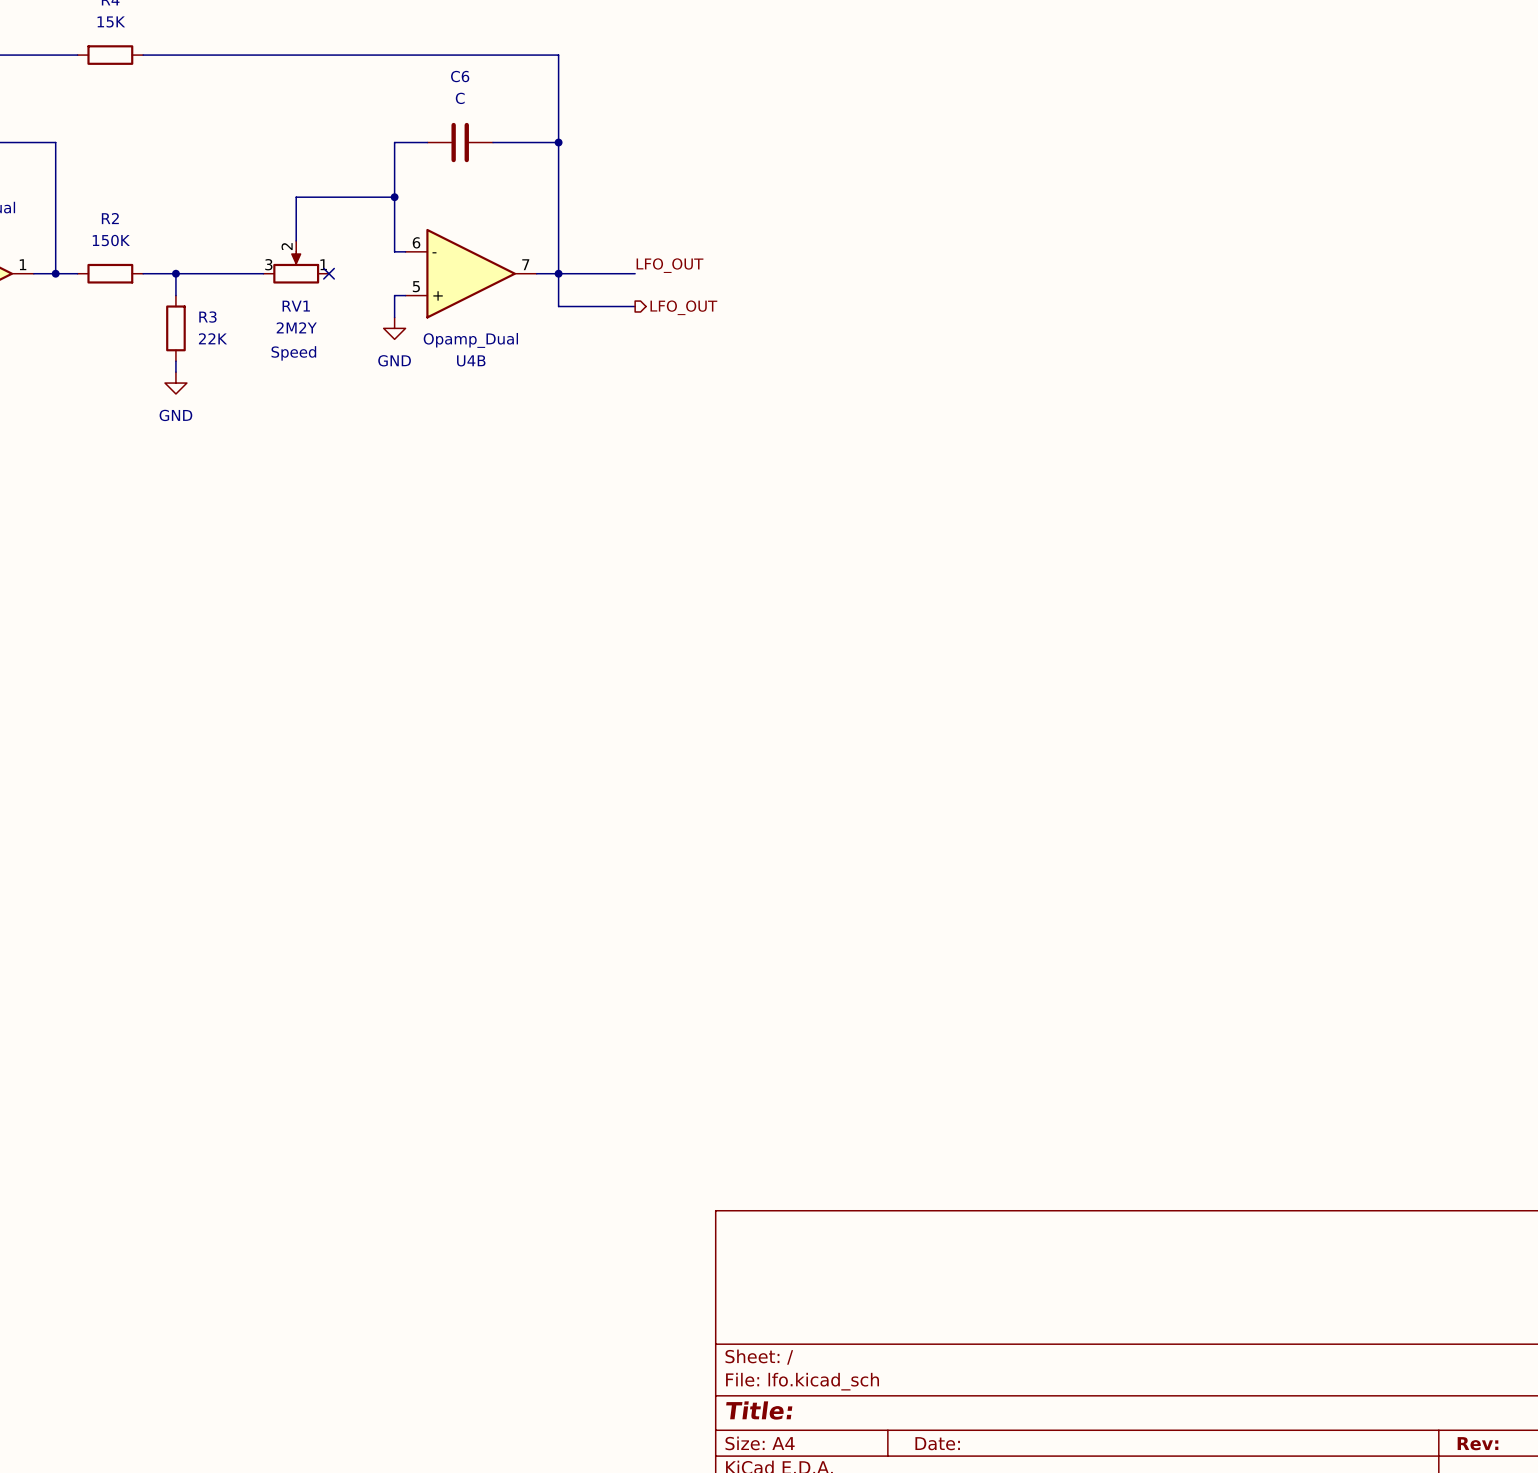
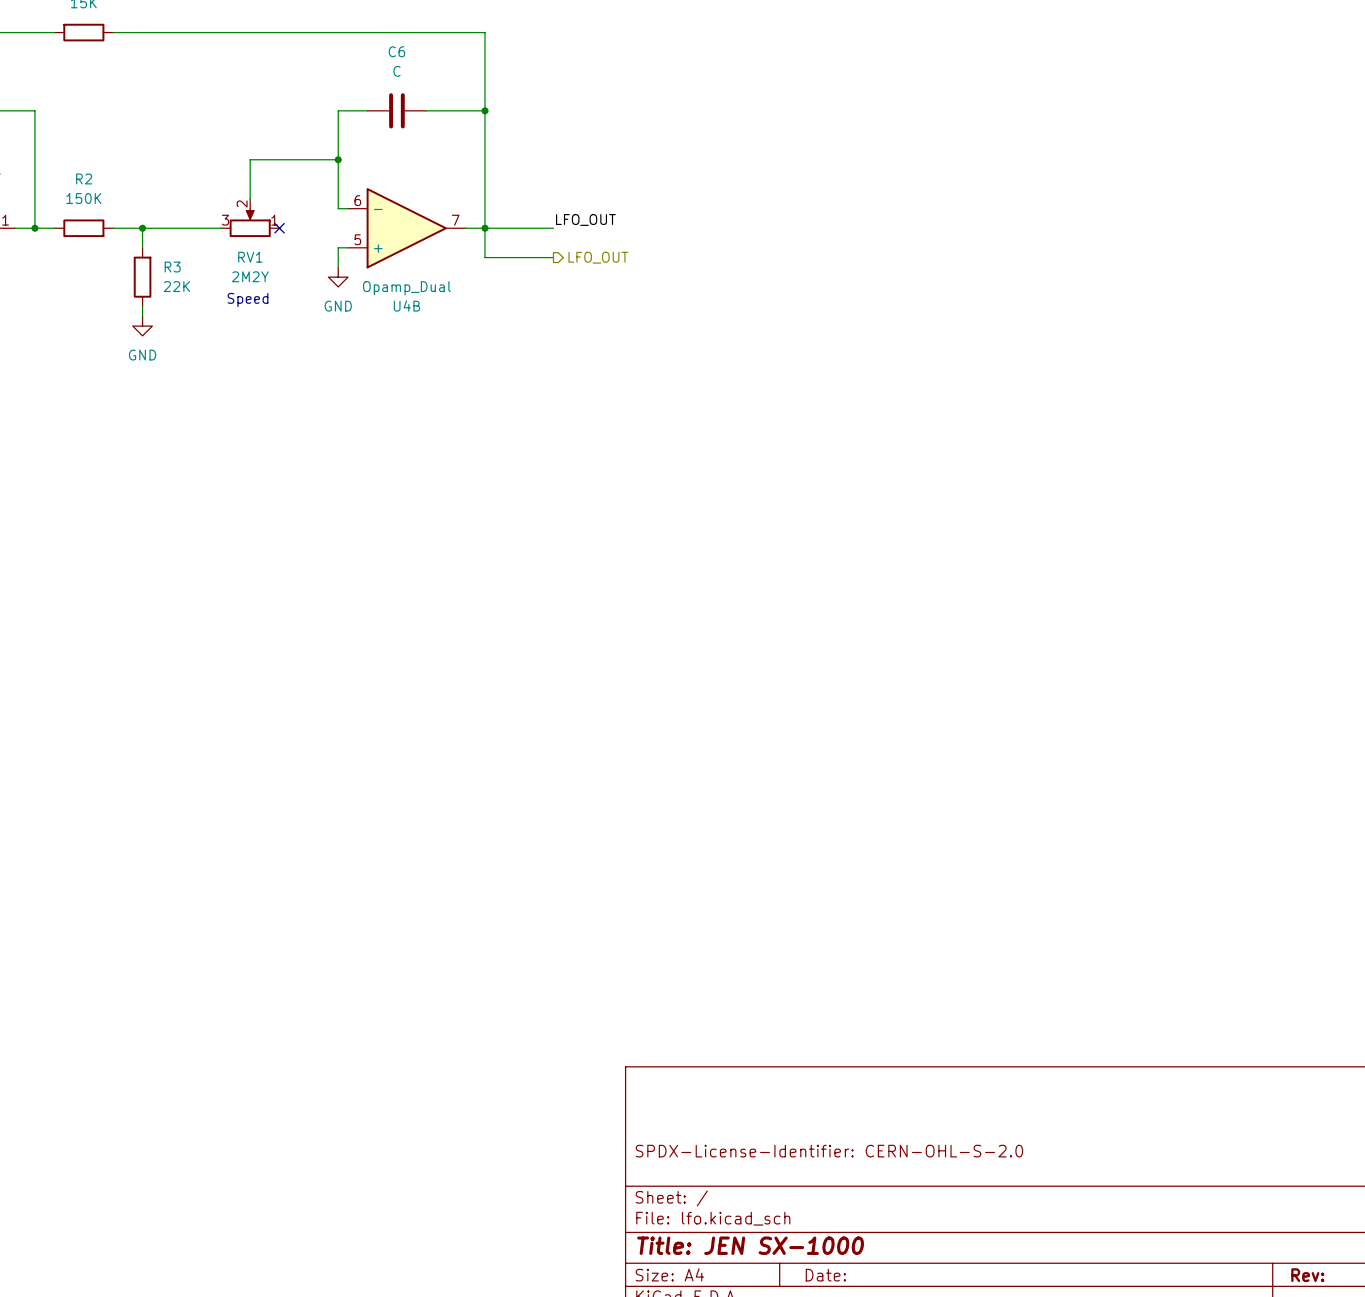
title block: none -> SPDX-License-Identifier: CERN-OHL-S-2.0 (829, 1151)
title block: Title: (759, 1410) -> Title: JEN SX-1000 (750, 1245)

